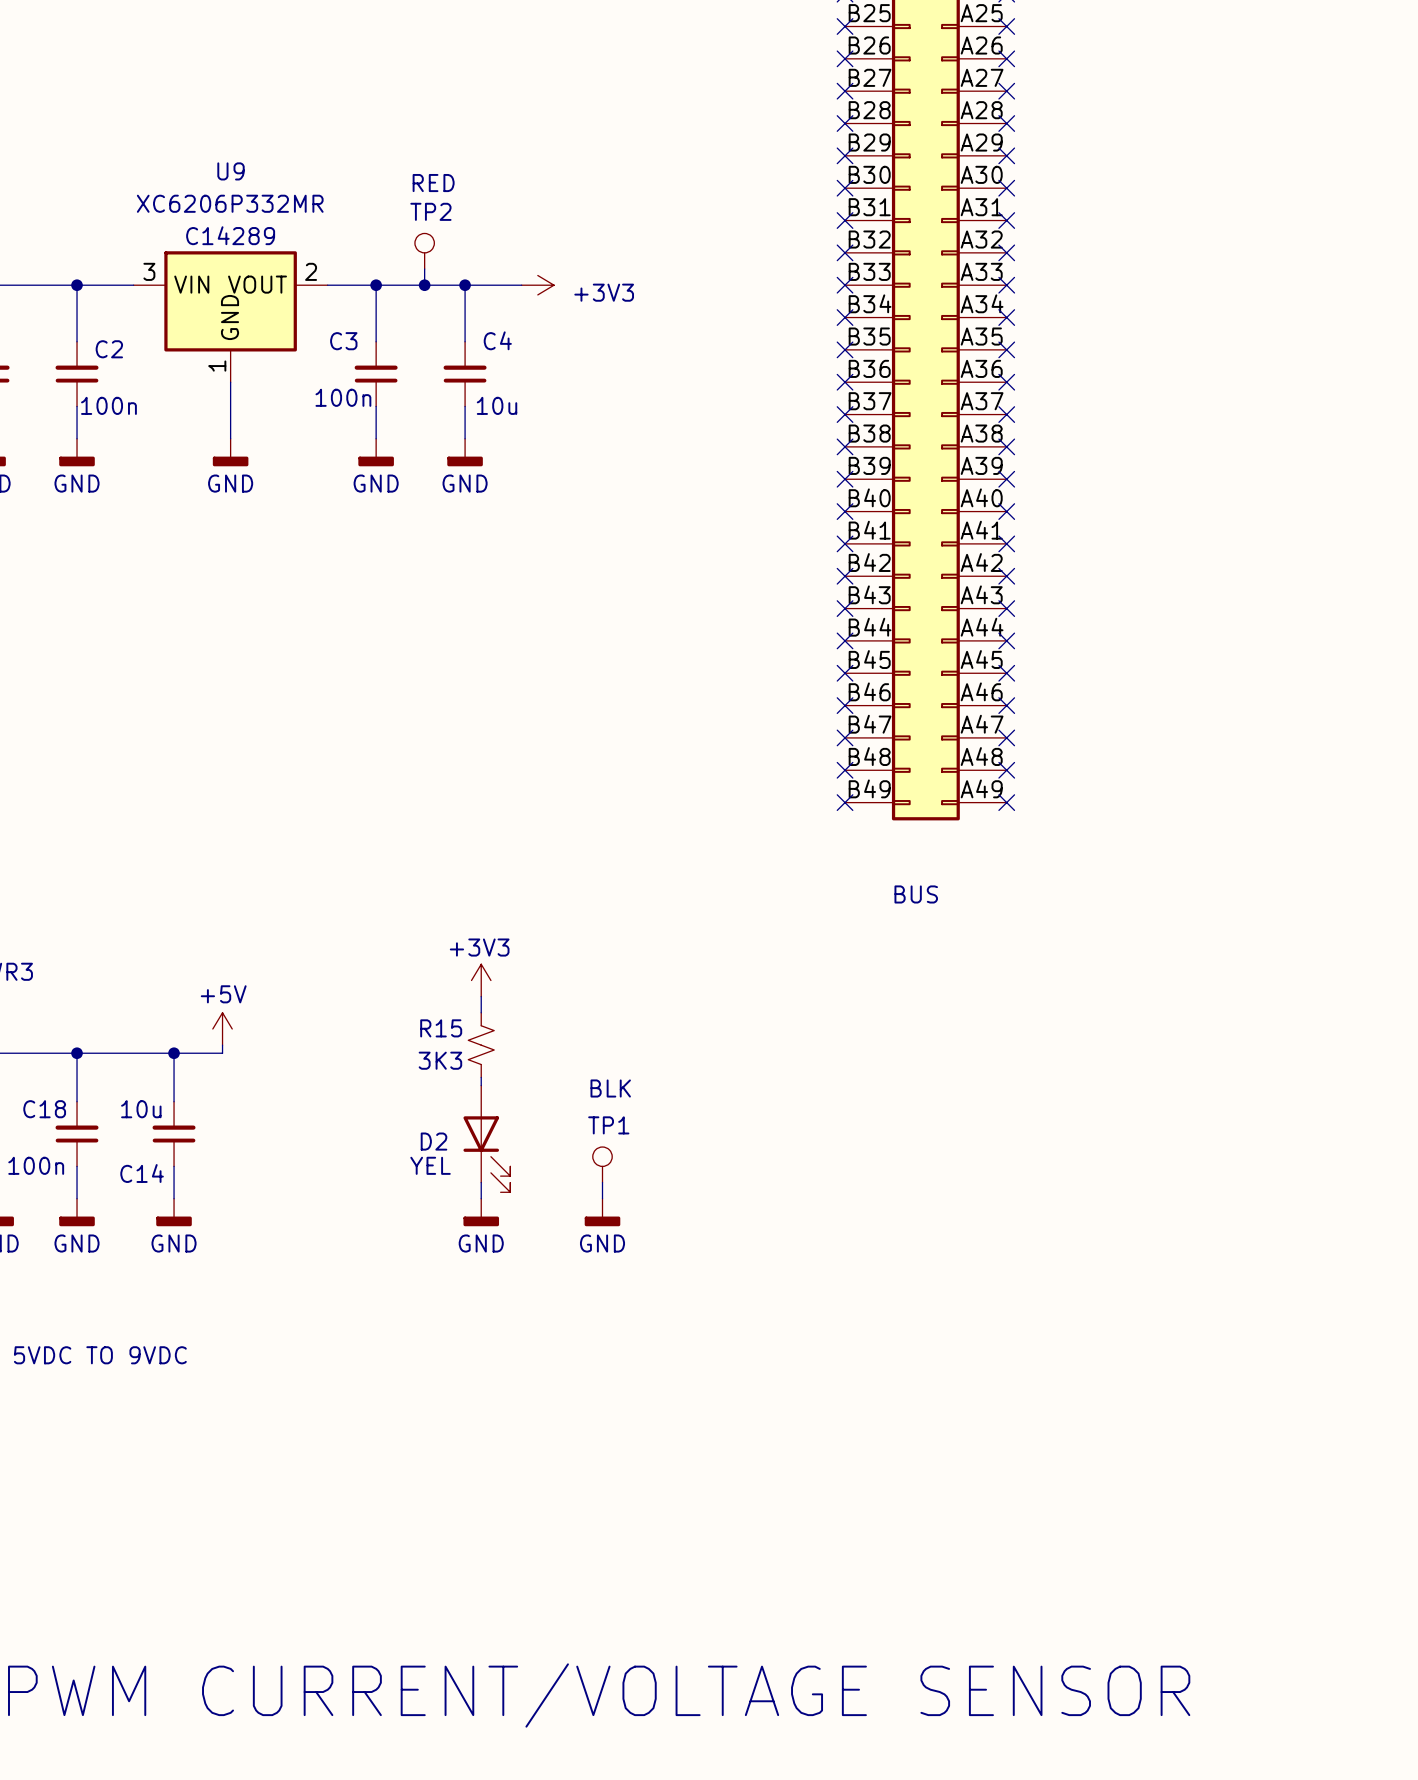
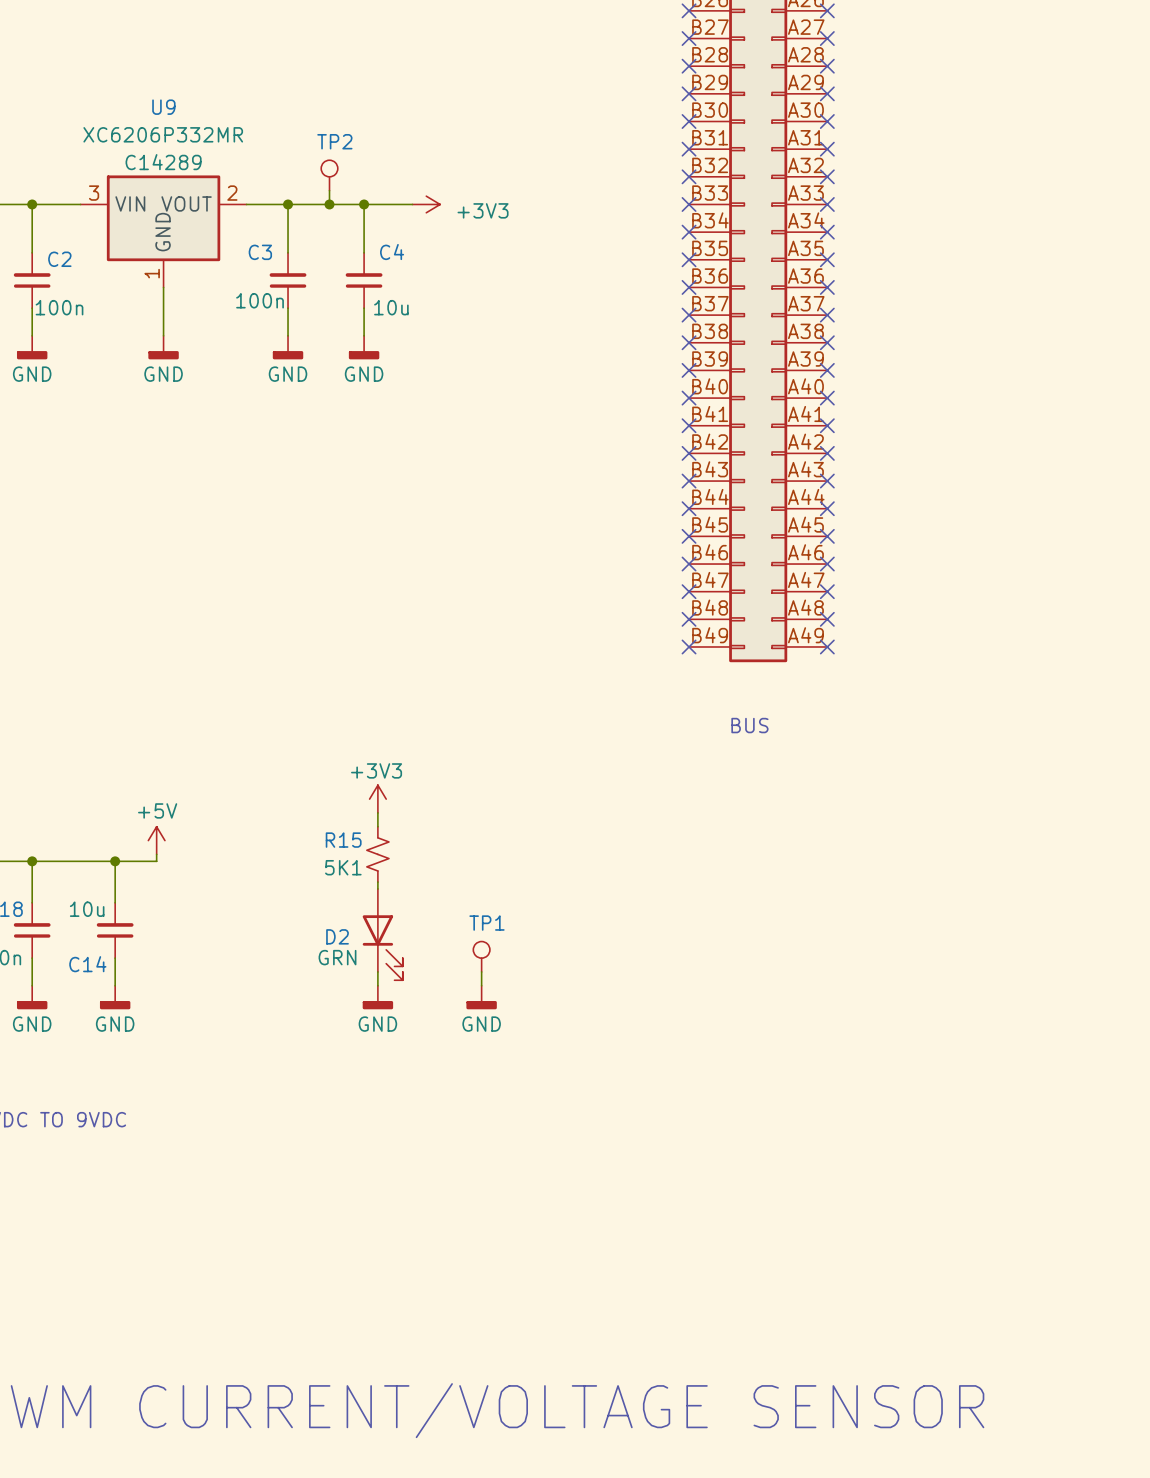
text: RED (433, 183) -> none
R15 value: 3K3 (440, 1060) -> 5K1 (343, 867)
text: BLK (610, 1088) -> none
D2 value: YEL (430, 1165) -> GRN (337, 957)

